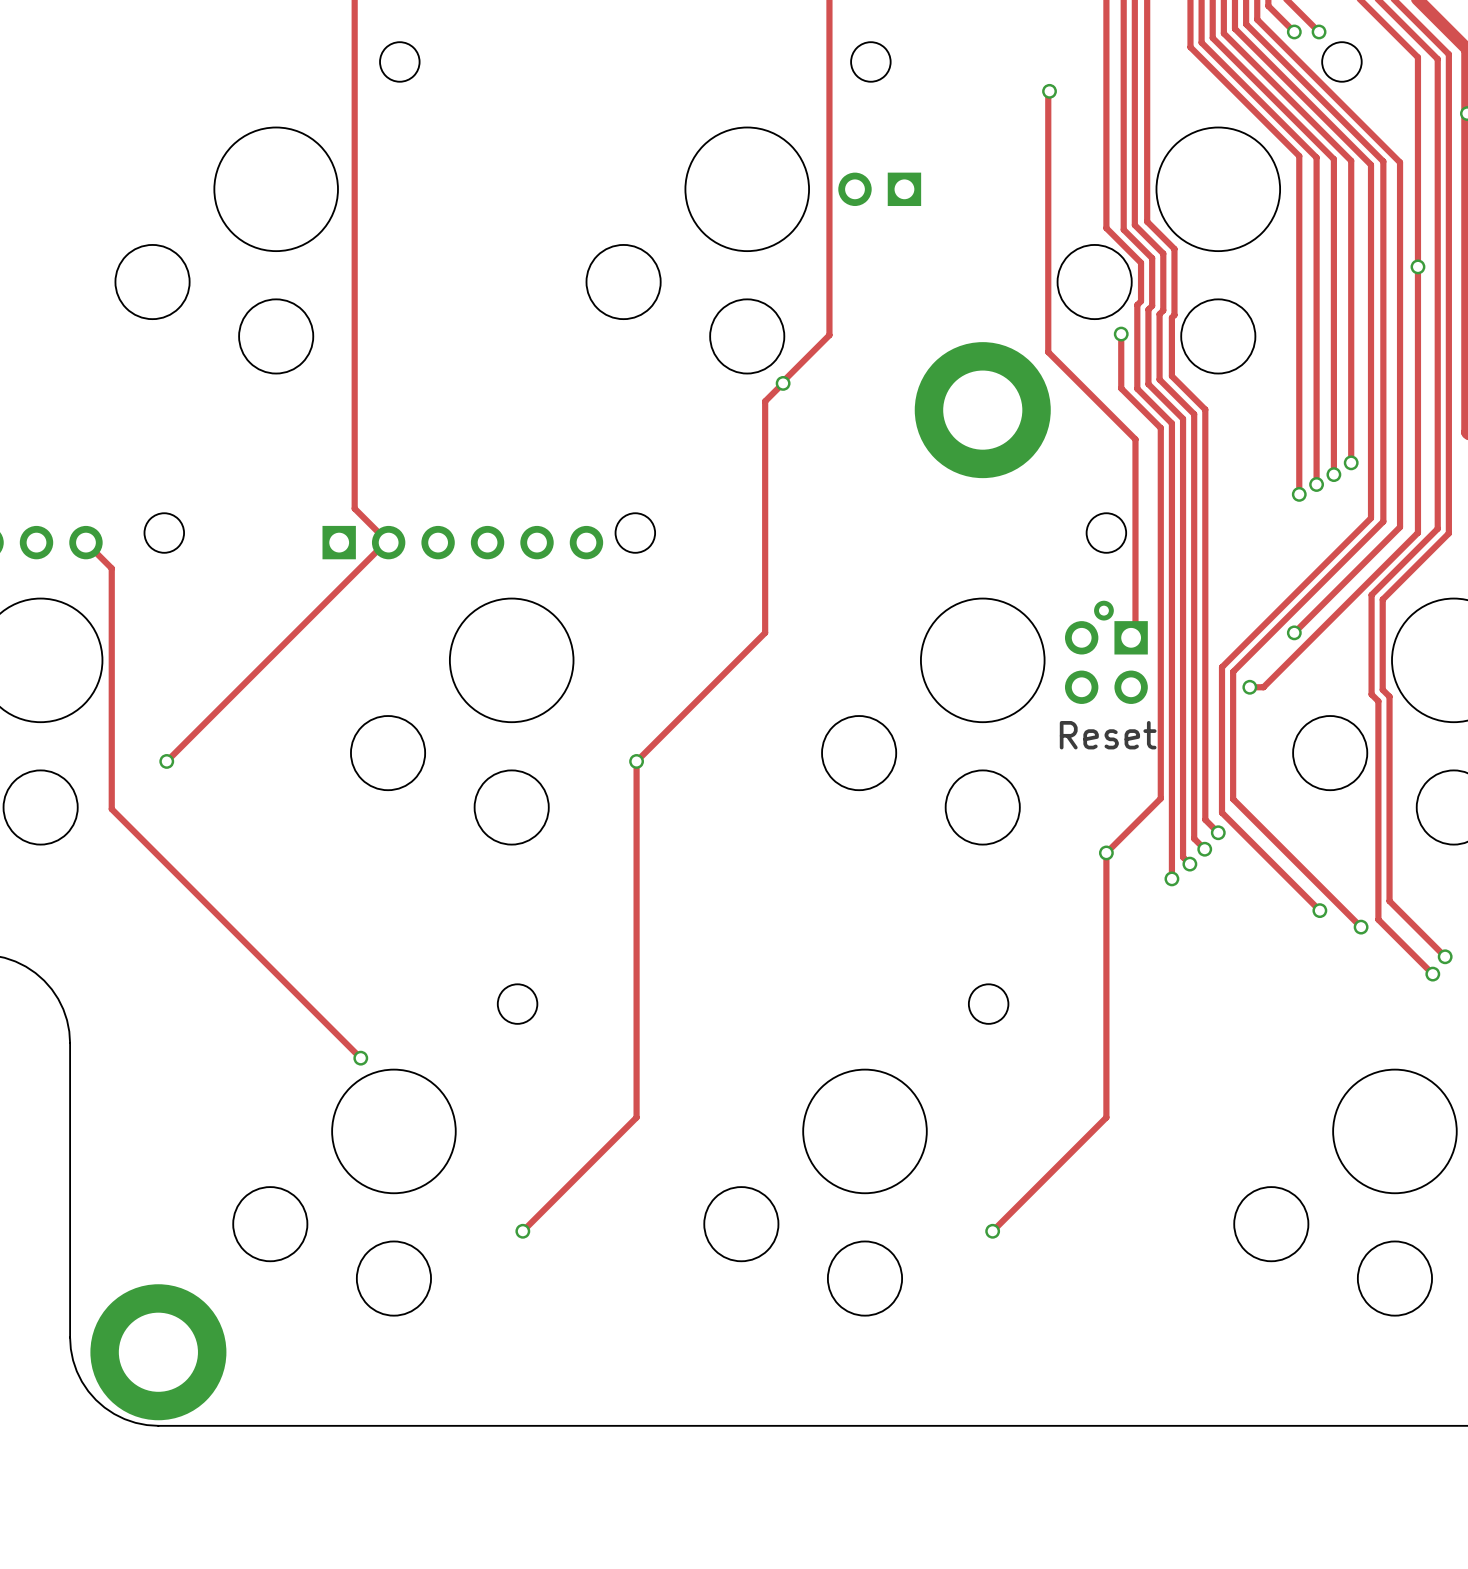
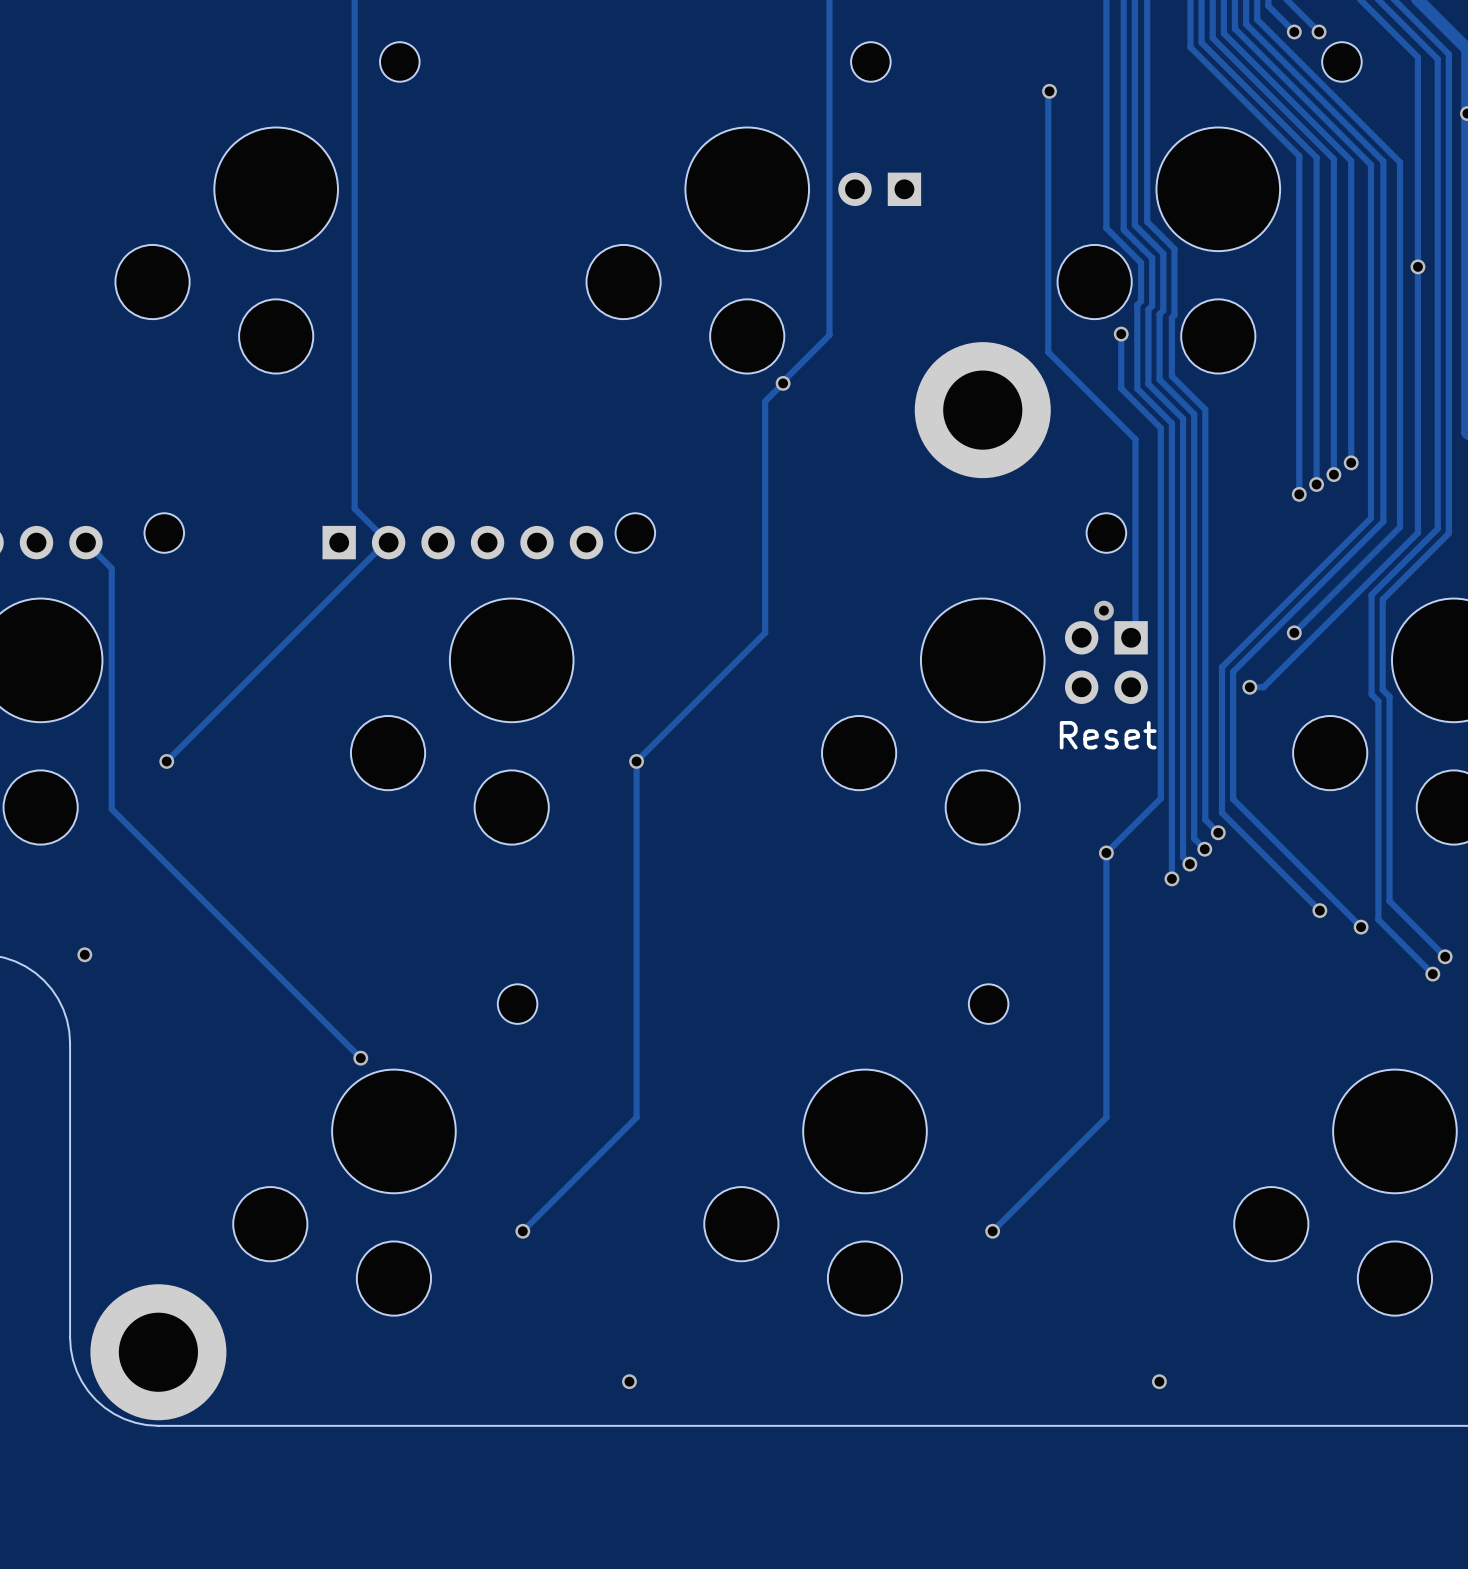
via: none -> (84, 954)
via: none -> (629, 1381)
via: none -> (1159, 1381)

